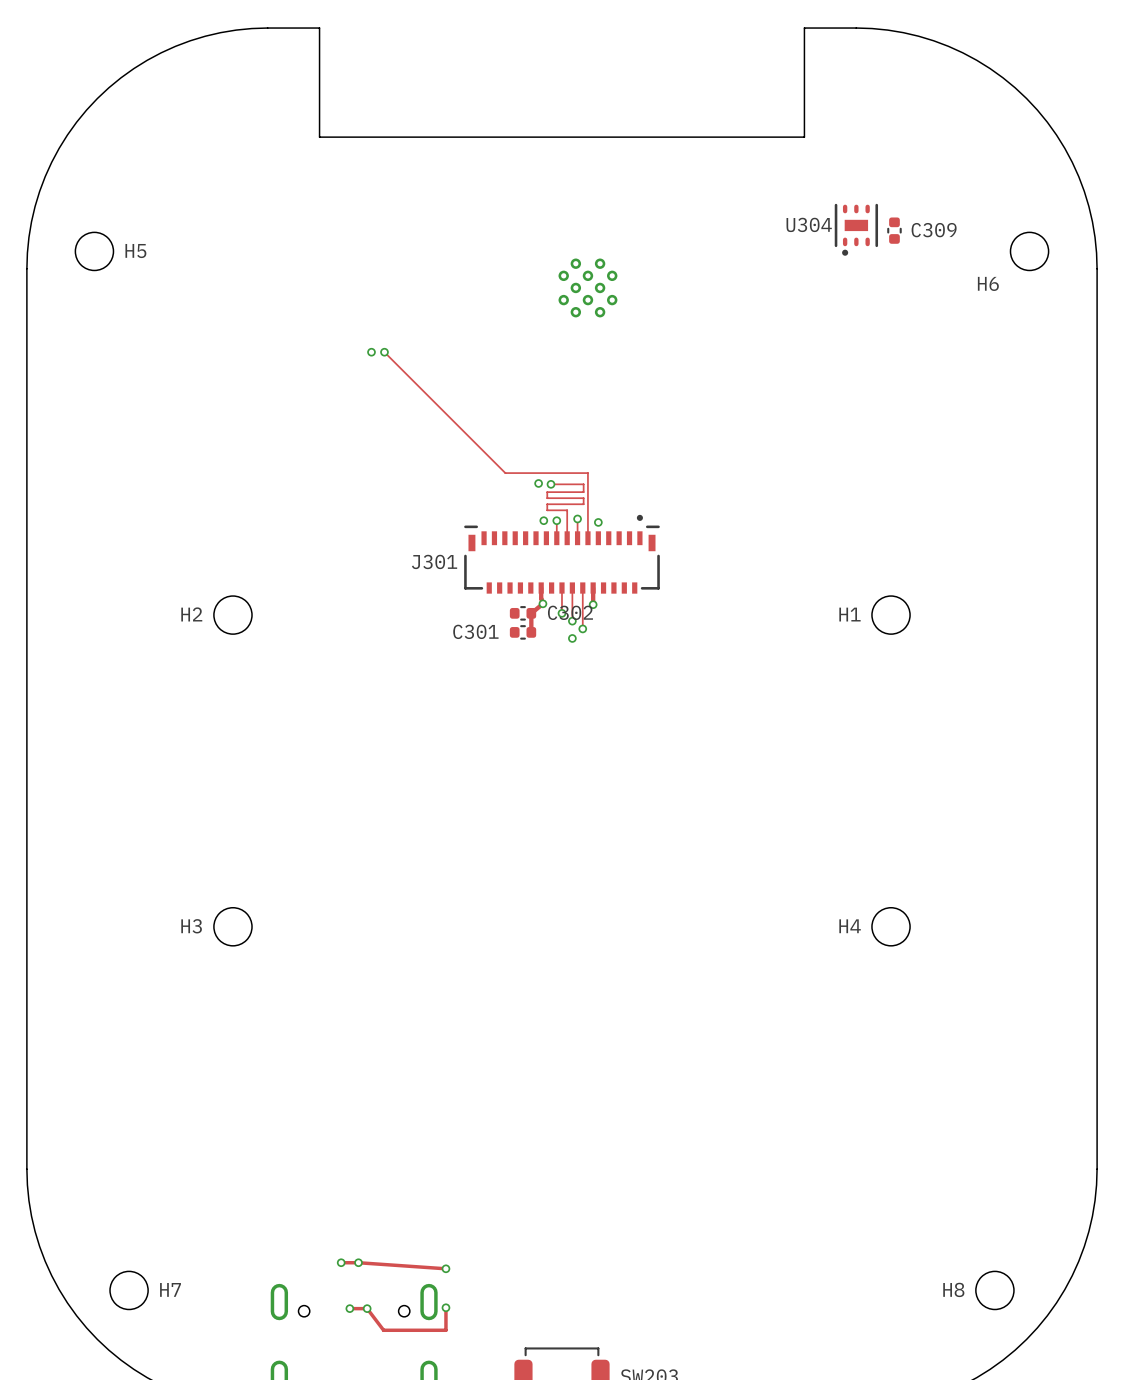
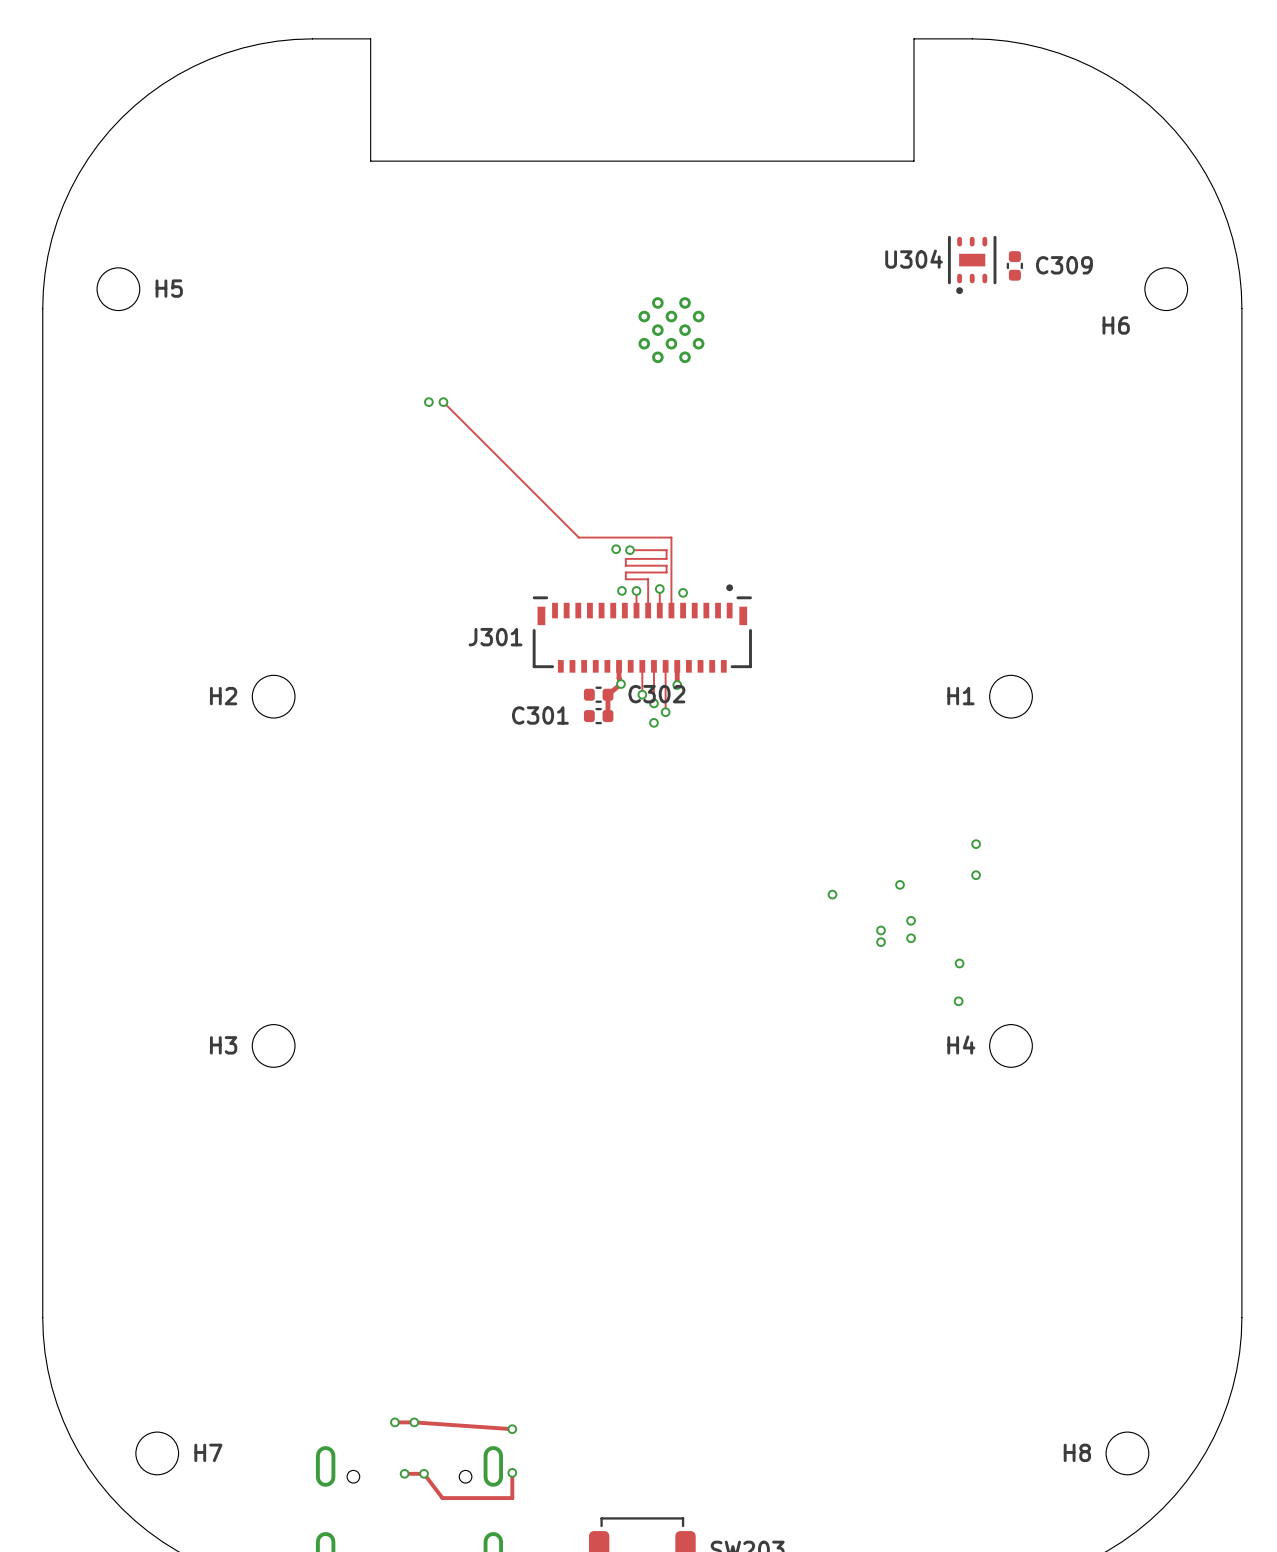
via: none -> (976, 844)
via: none -> (976, 875)
via: none -> (900, 884)
via: none -> (832, 894)
via: none -> (911, 920)
via: none -> (881, 930)
via: none -> (911, 938)
via: none -> (881, 942)
via: none -> (959, 963)
via: none -> (958, 1001)

